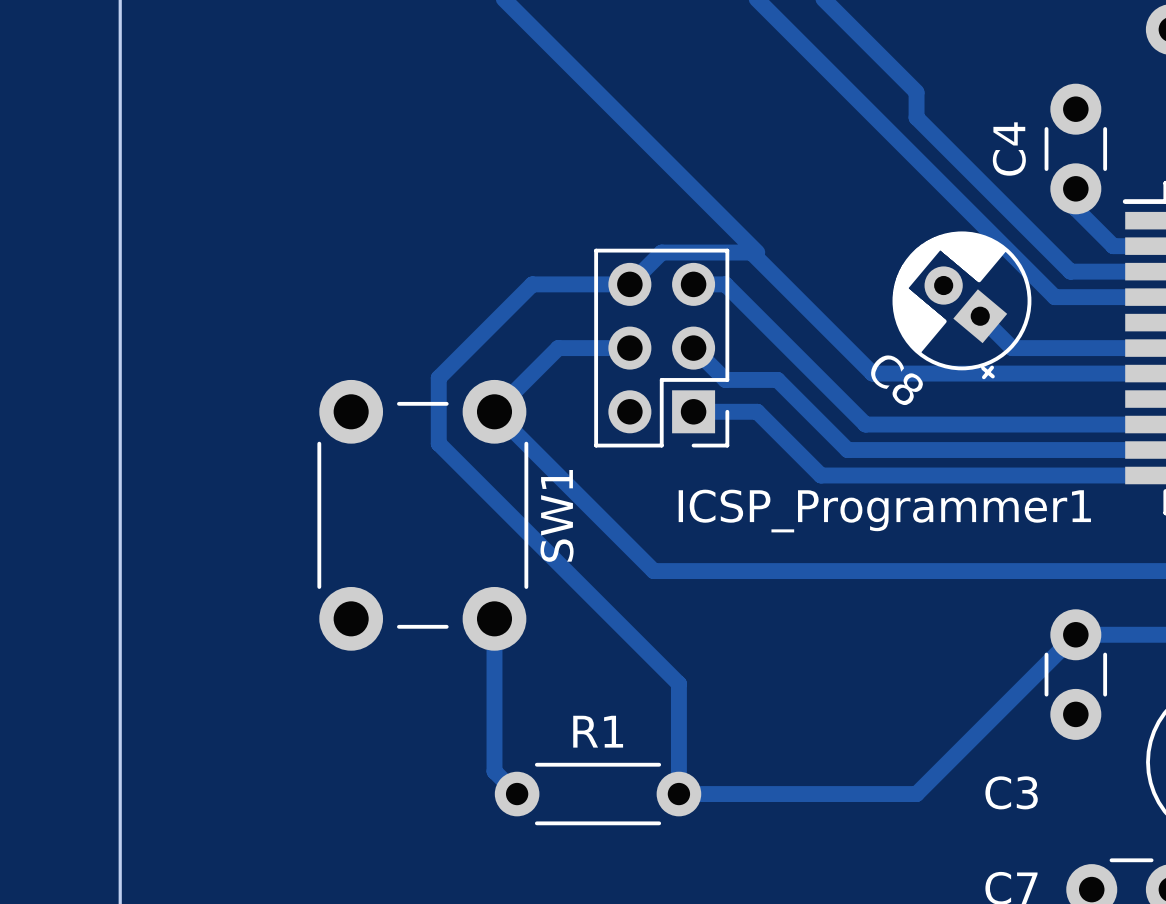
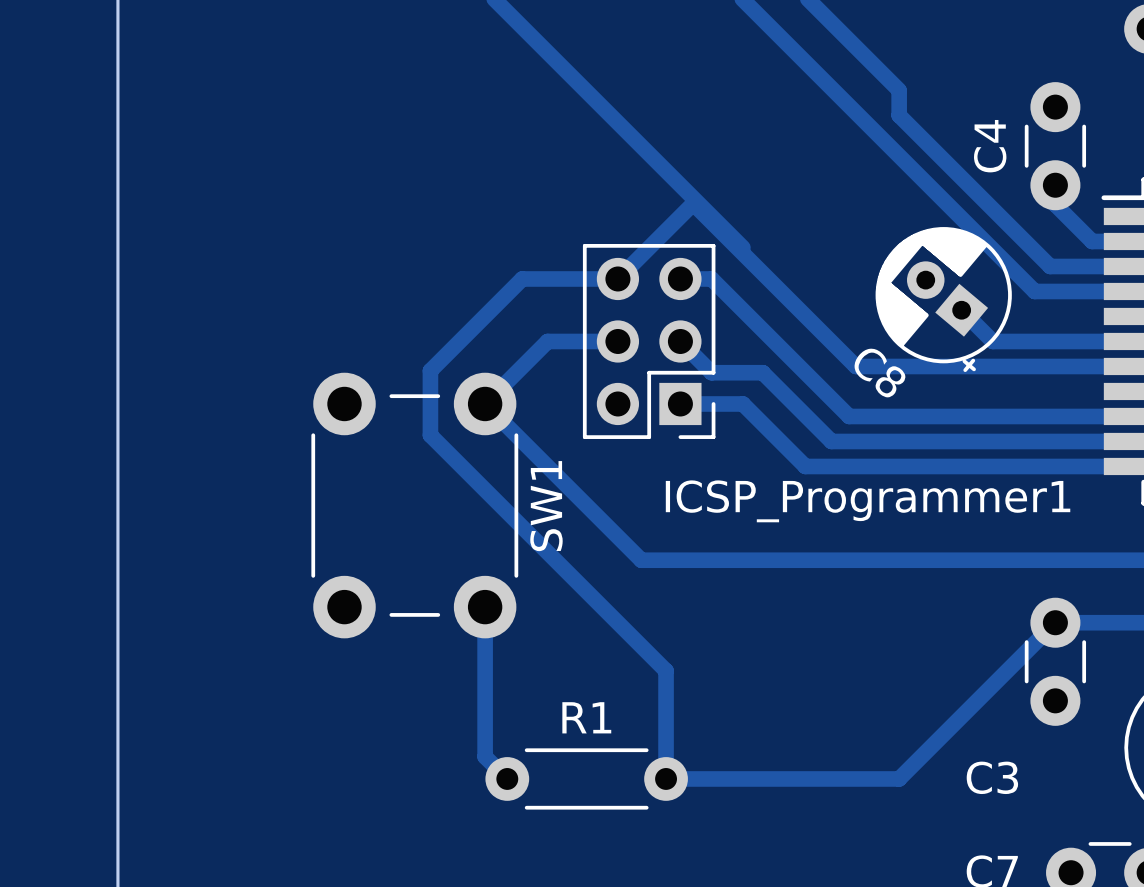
track: (661, 252) (751, 252) -> (649, 247) (693, 203) (737, 247)

